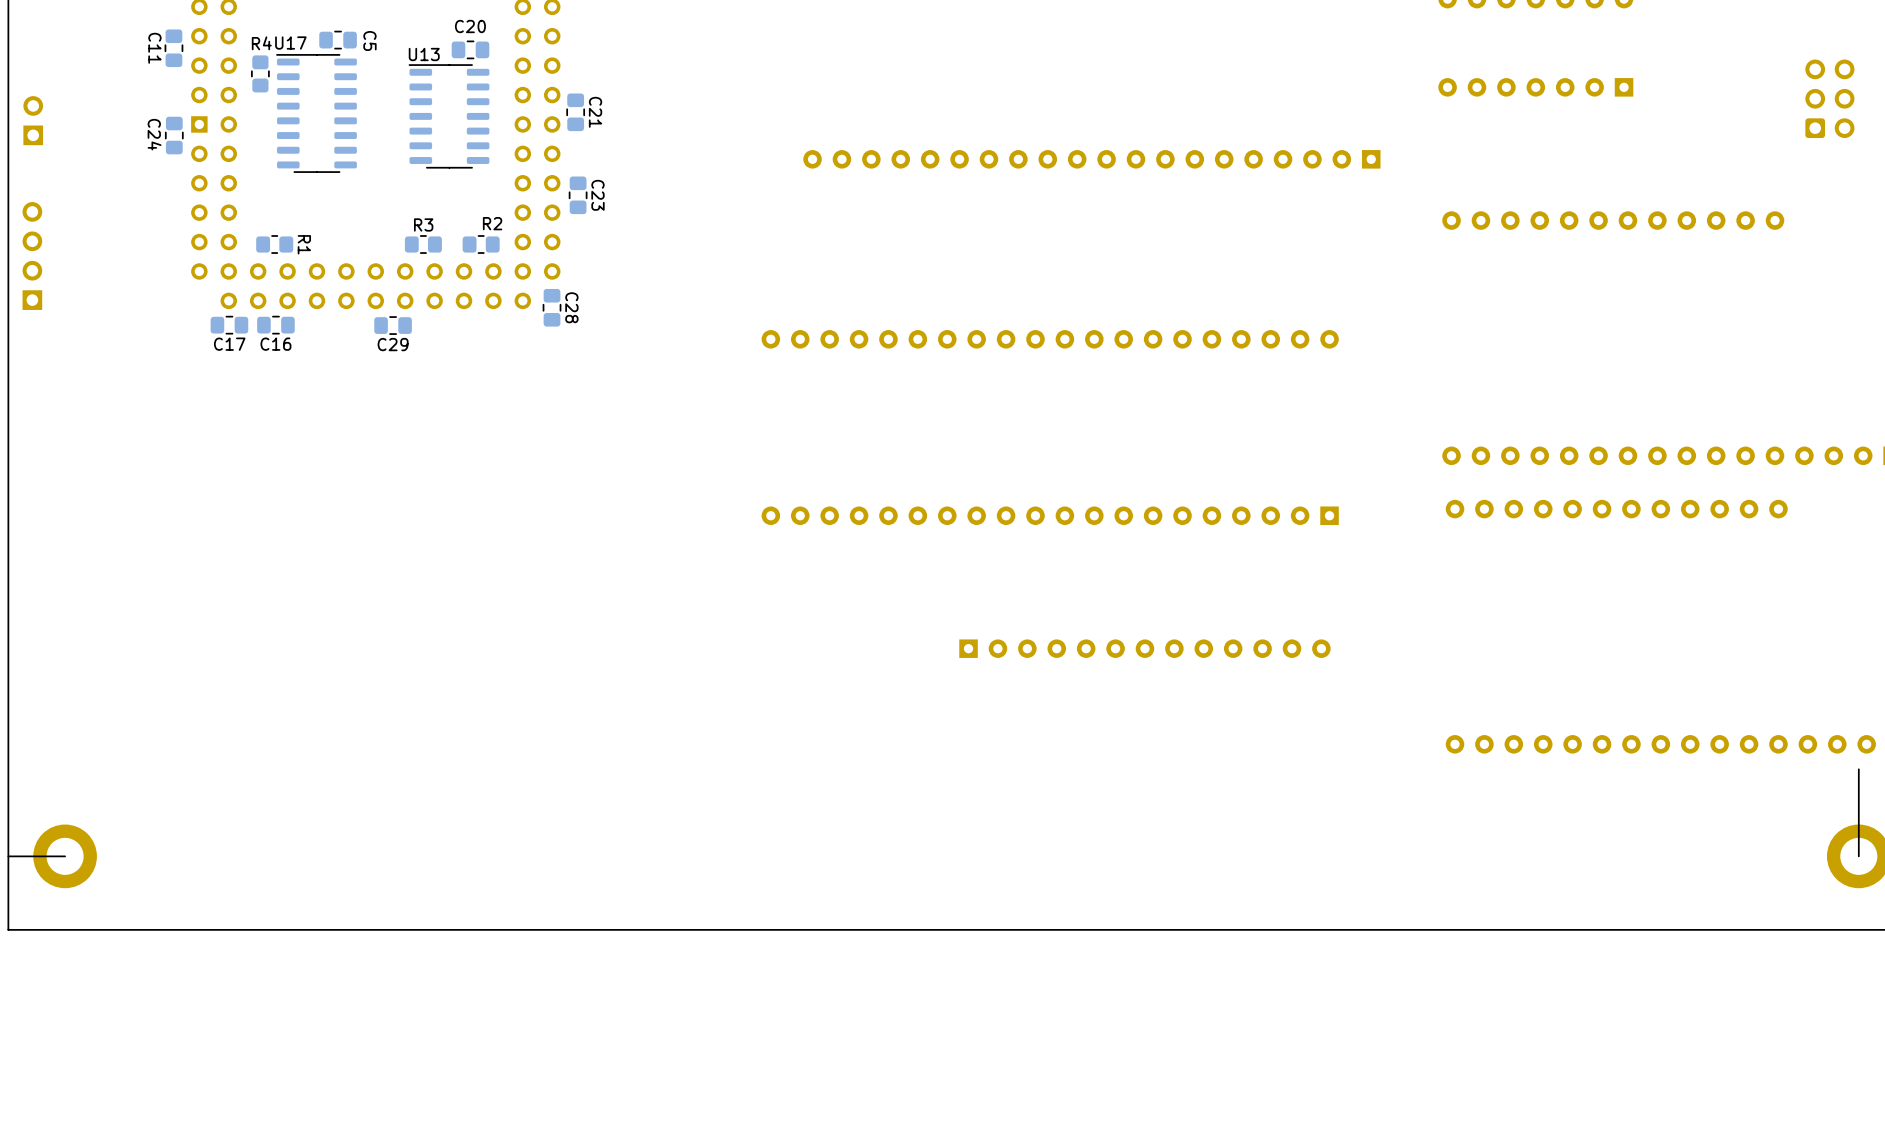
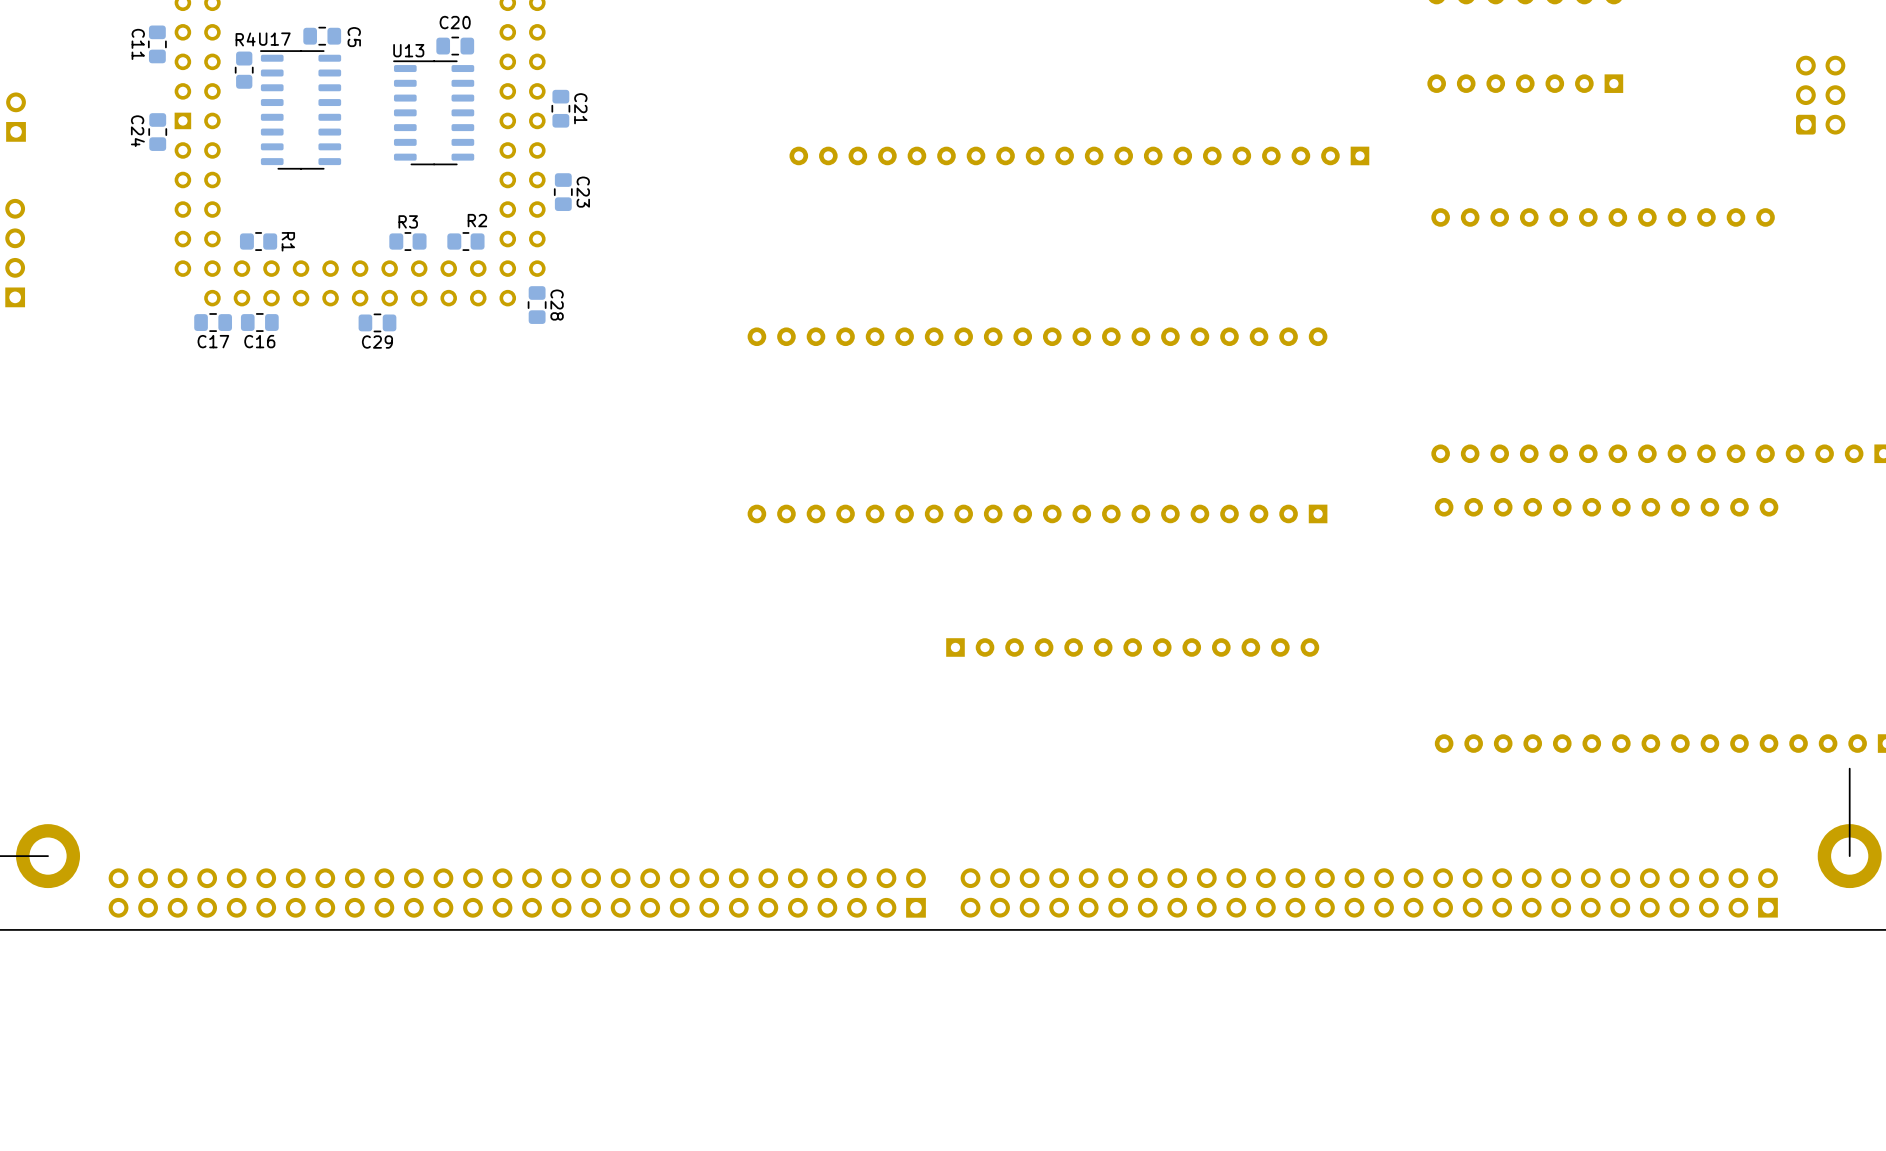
part: none -> (517, 893)
part: none -> (1369, 892)

